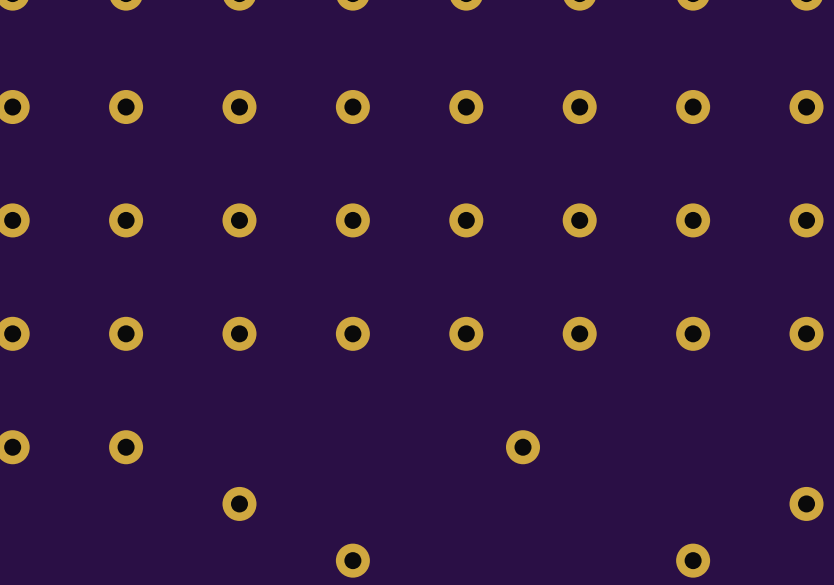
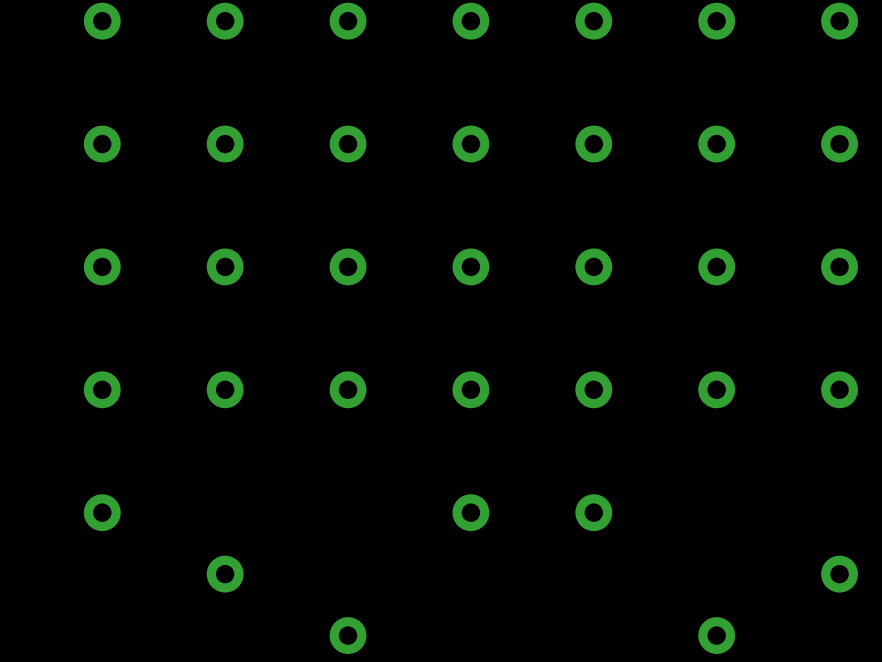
via: none -> (470, 512)
via: (523, 447) -> none
via: none -> (593, 512)

